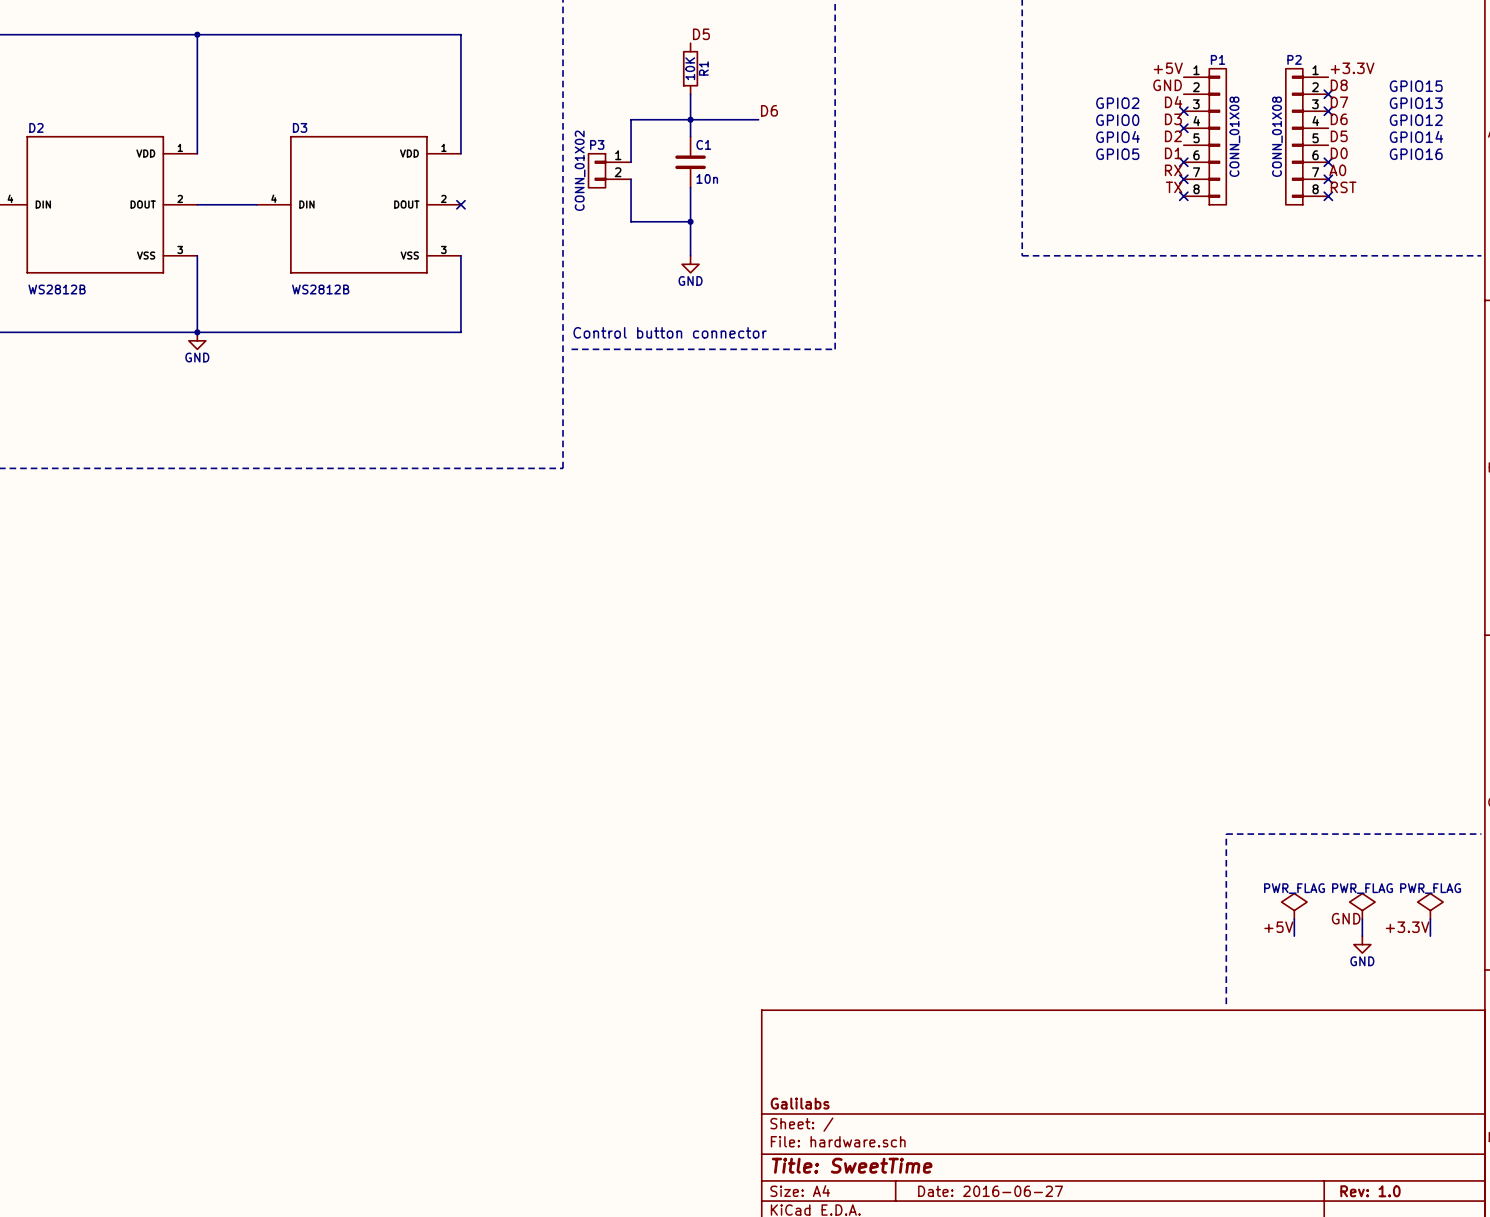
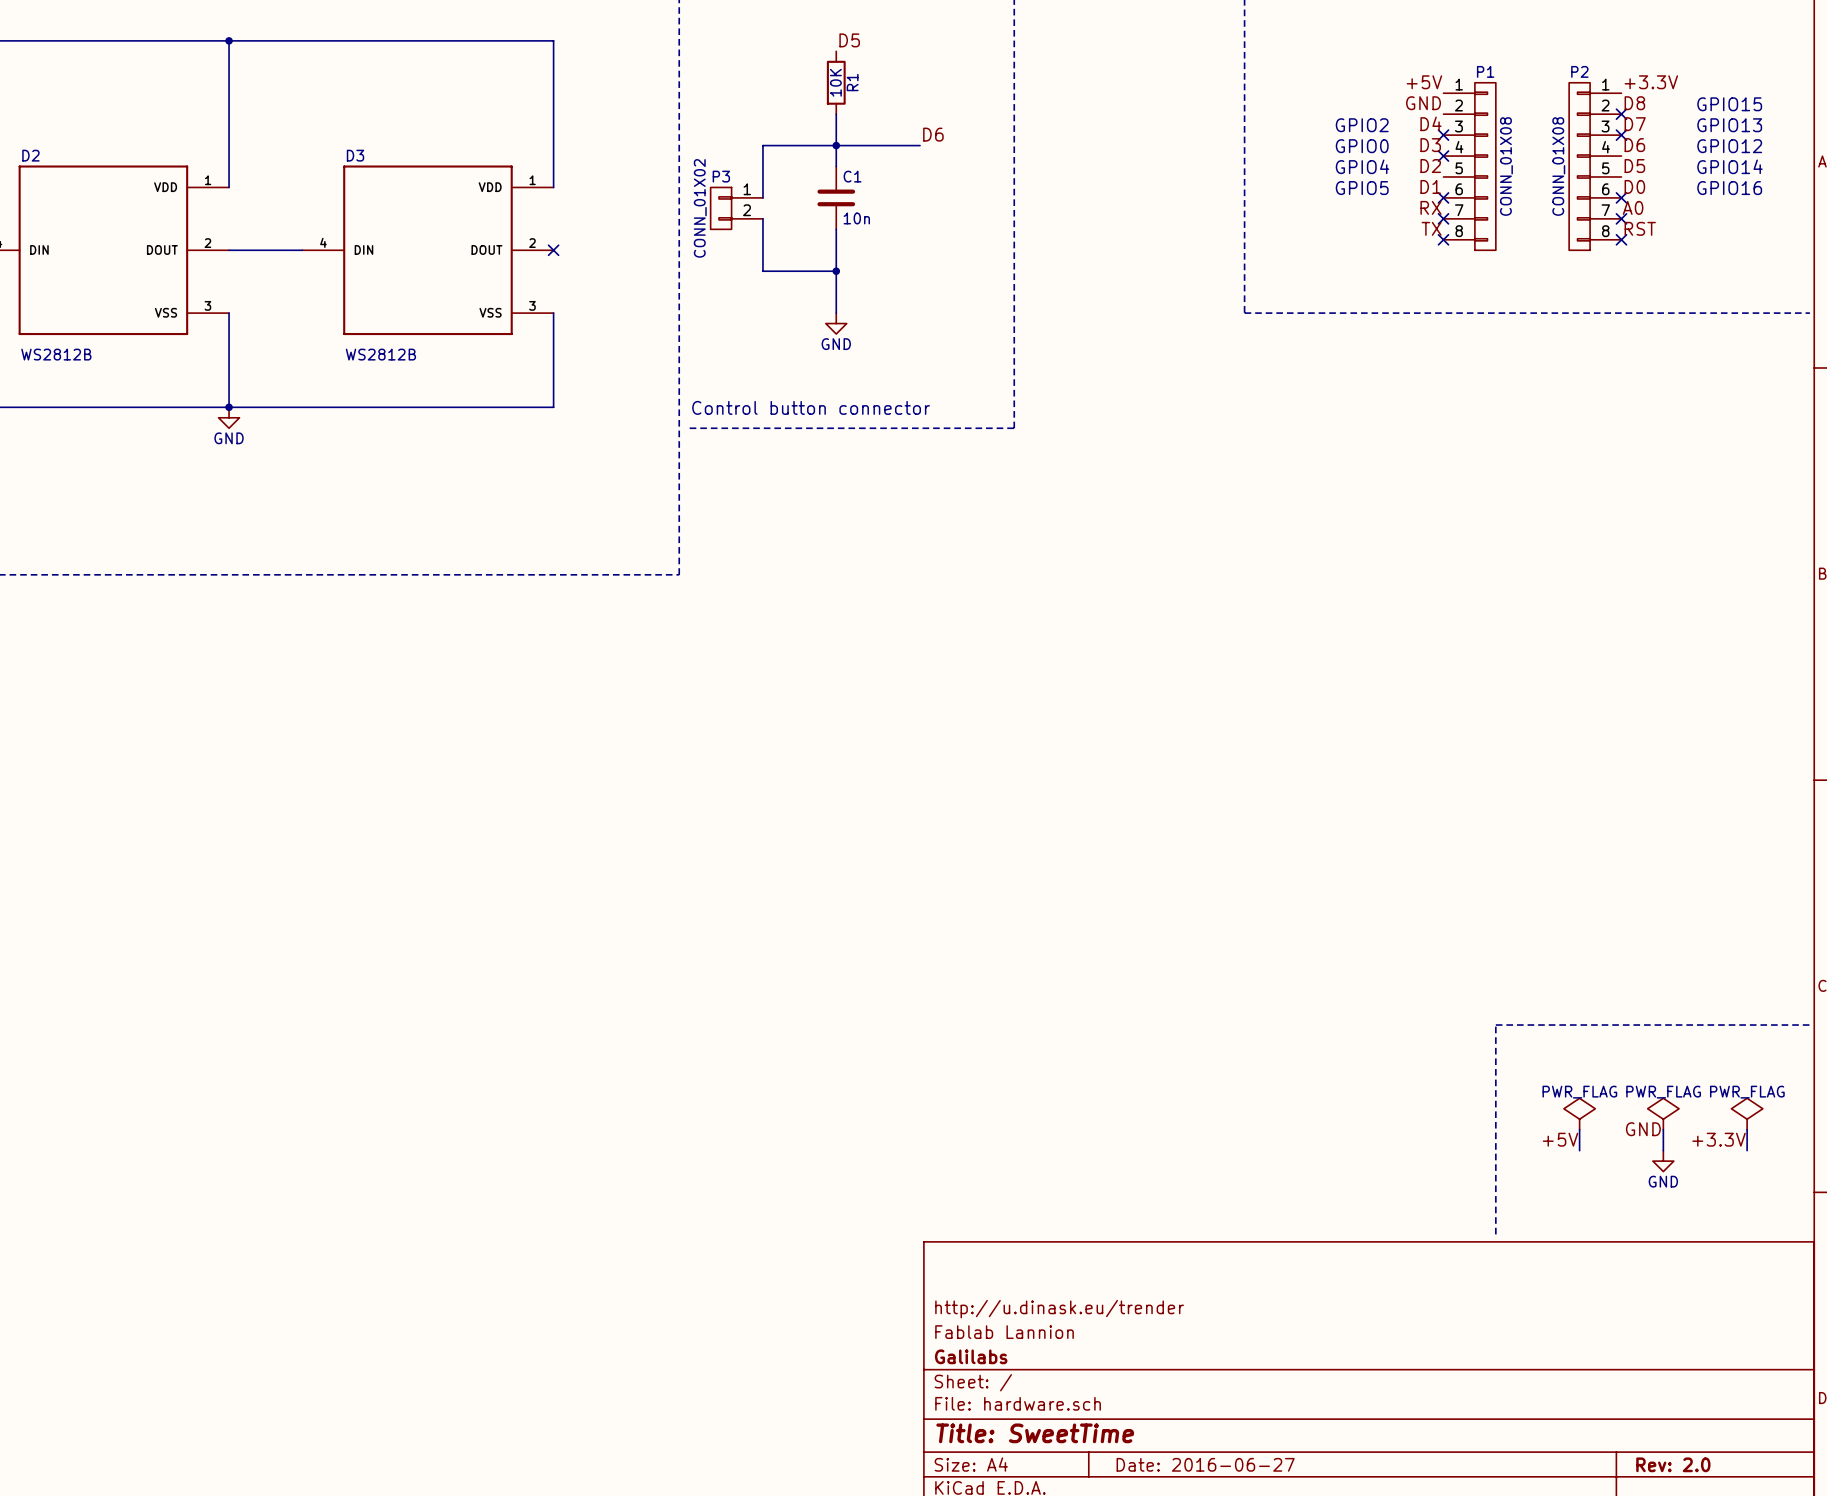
title block: none -> http://u.dinask.eu/trender (1059, 1309)
title block: none -> Fablab Lannion (1004, 1332)
title block: Rev: 1.0 (1370, 1191) -> Rev: 2.0 (1673, 1464)

